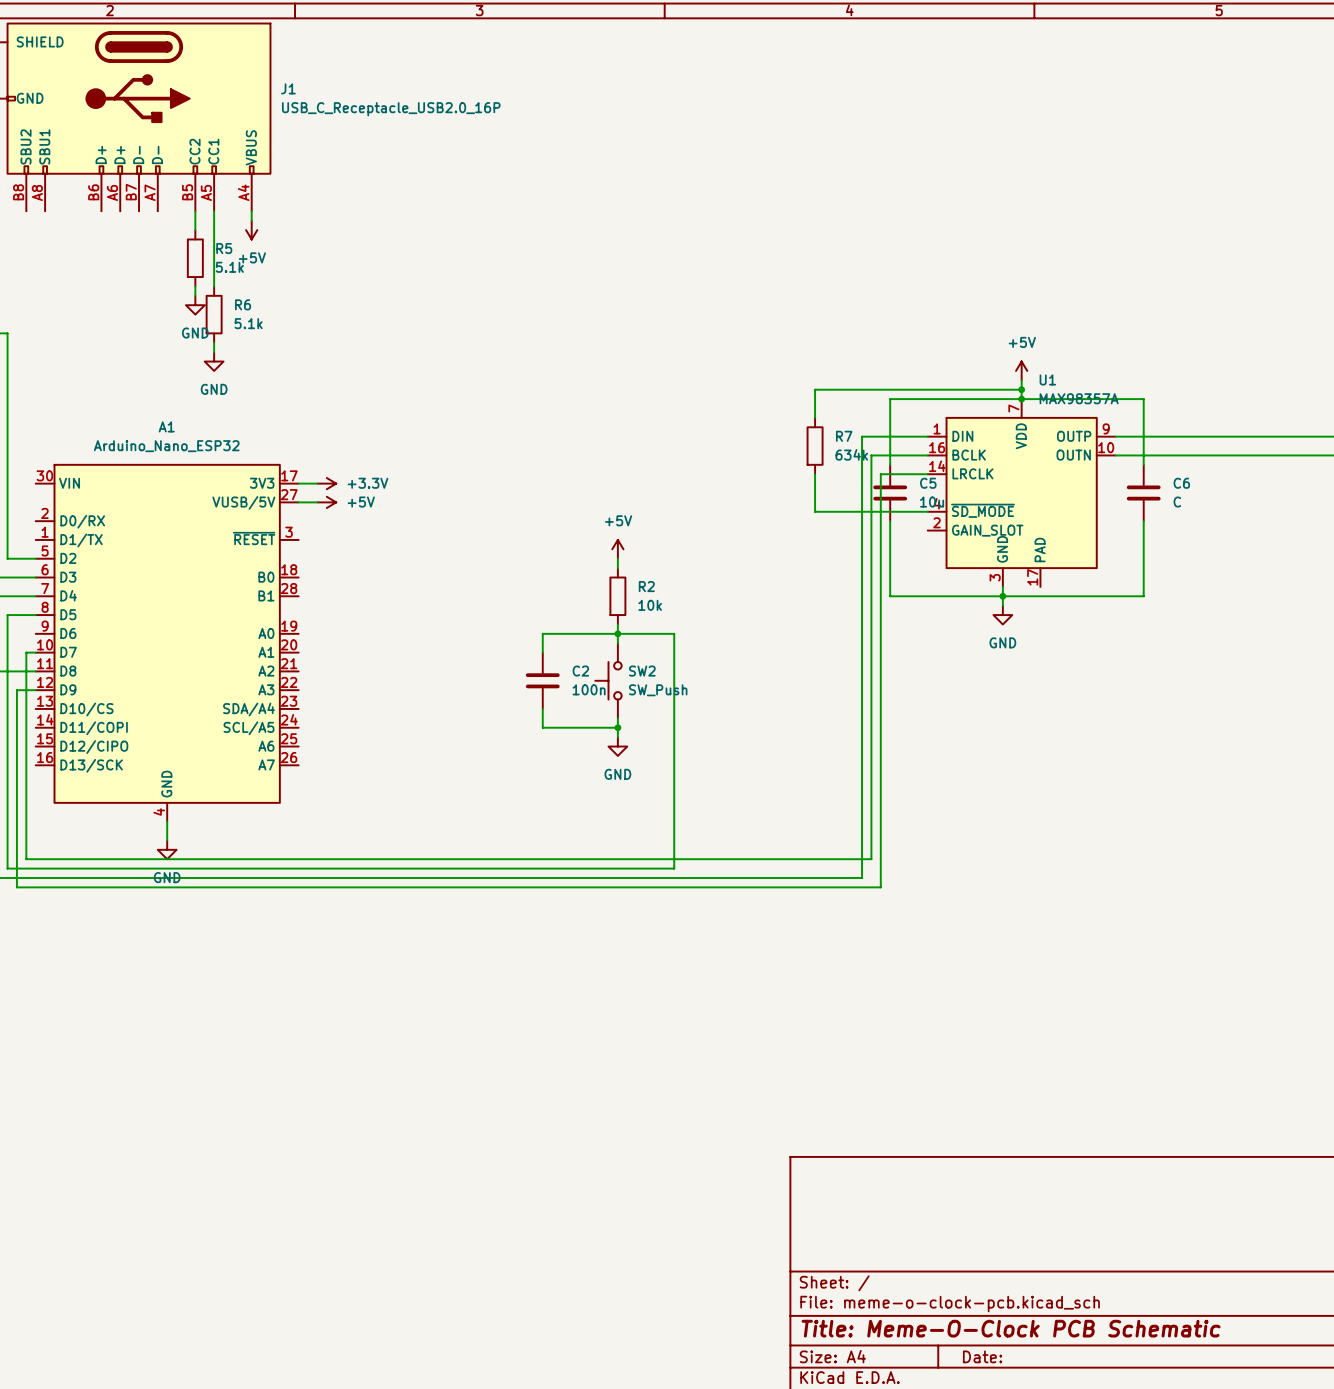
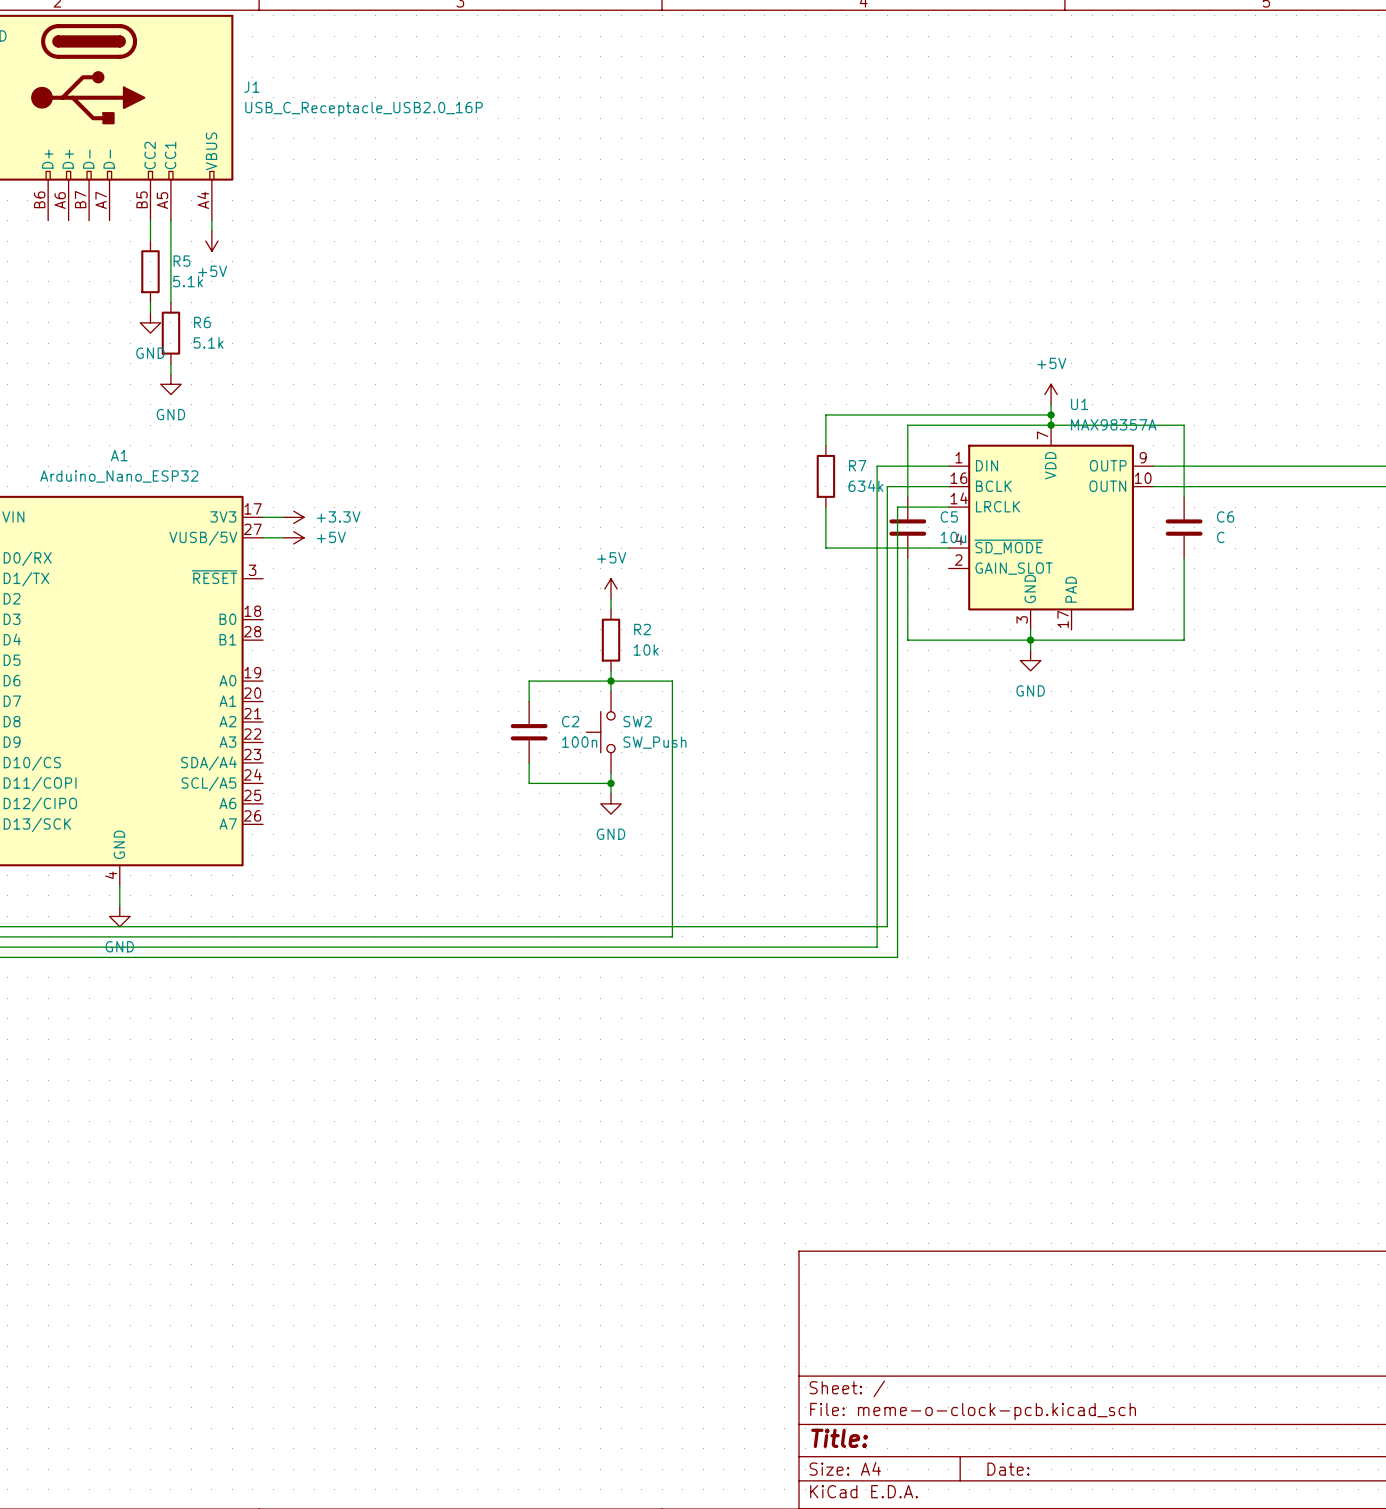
title block: Title: Meme-O-Clock PCB Schematic (1011, 1328) -> Title: (839, 1438)

